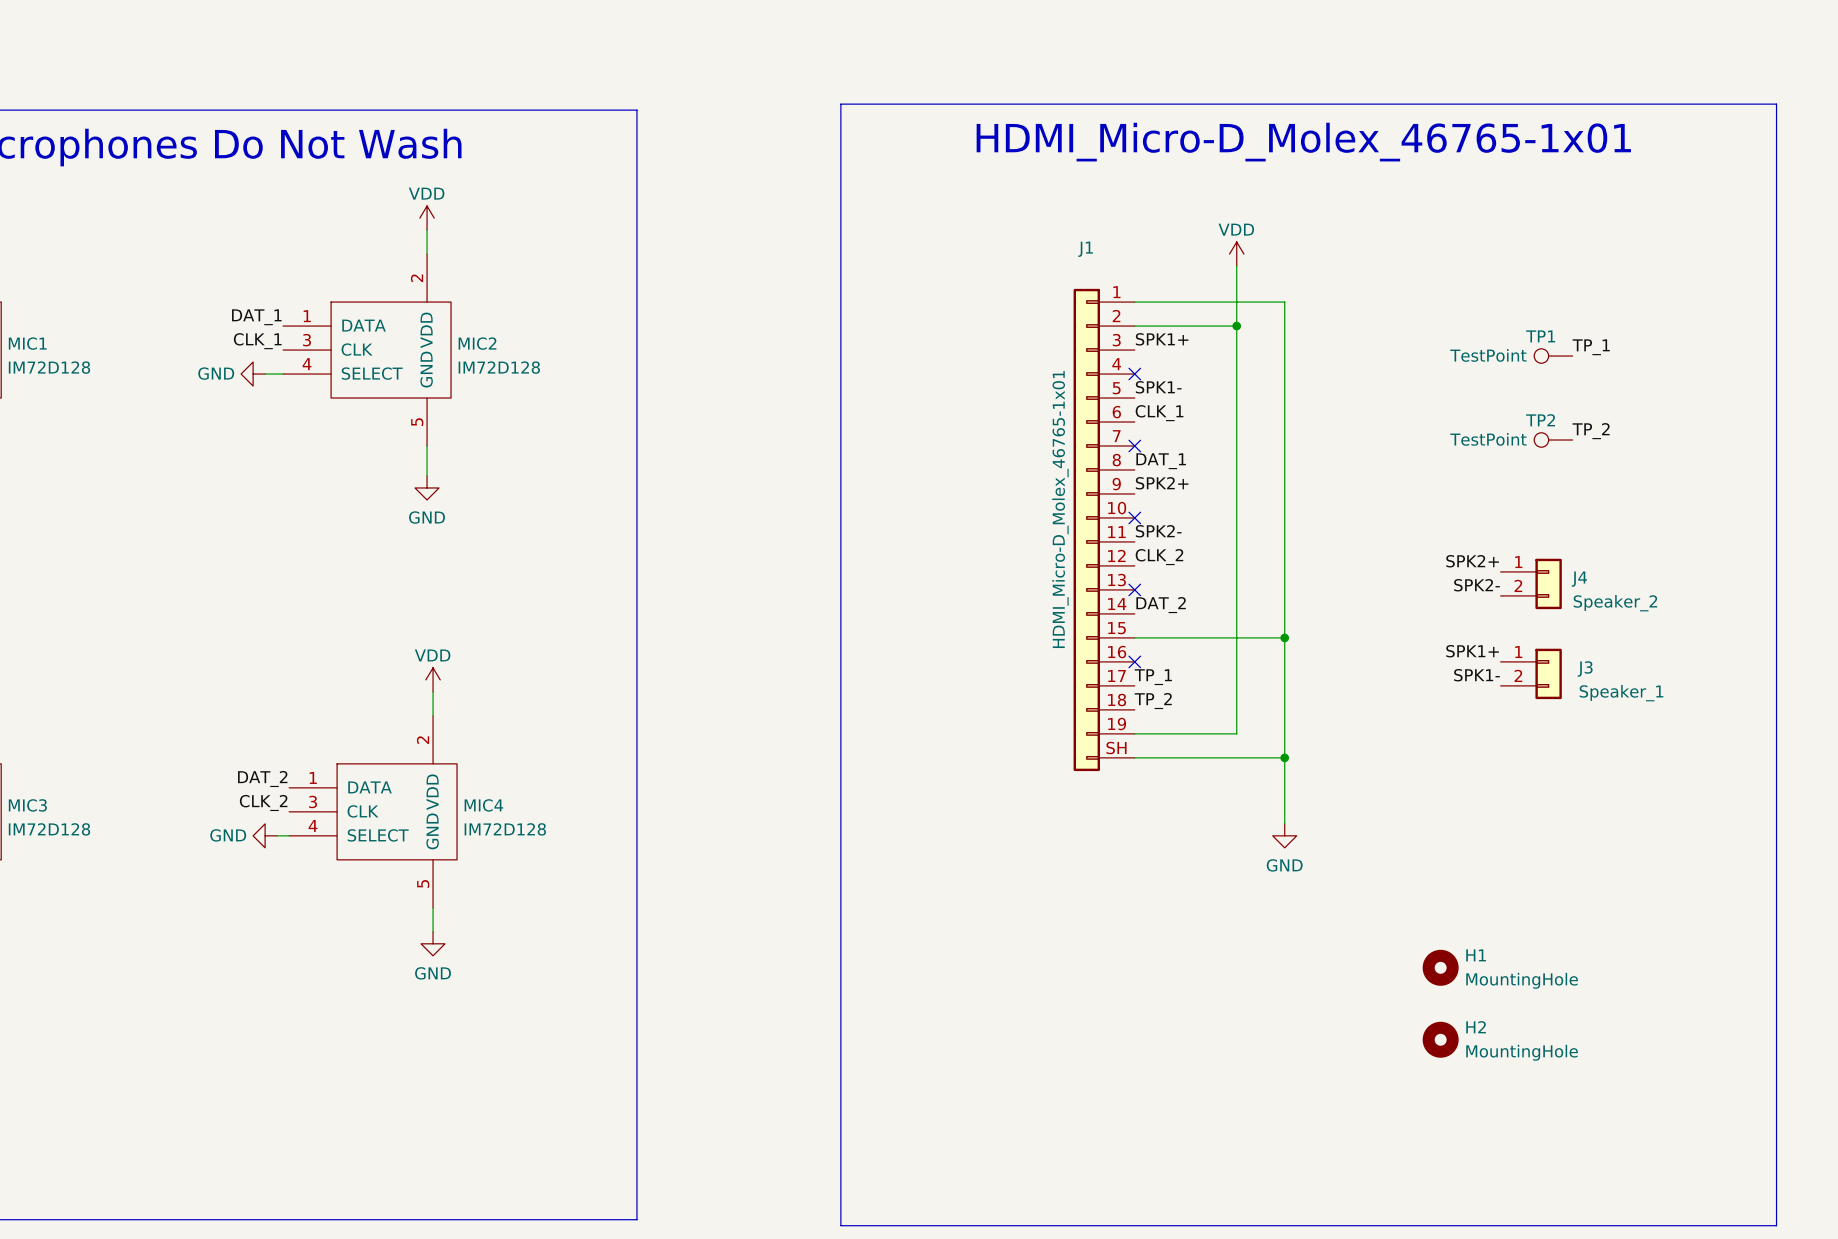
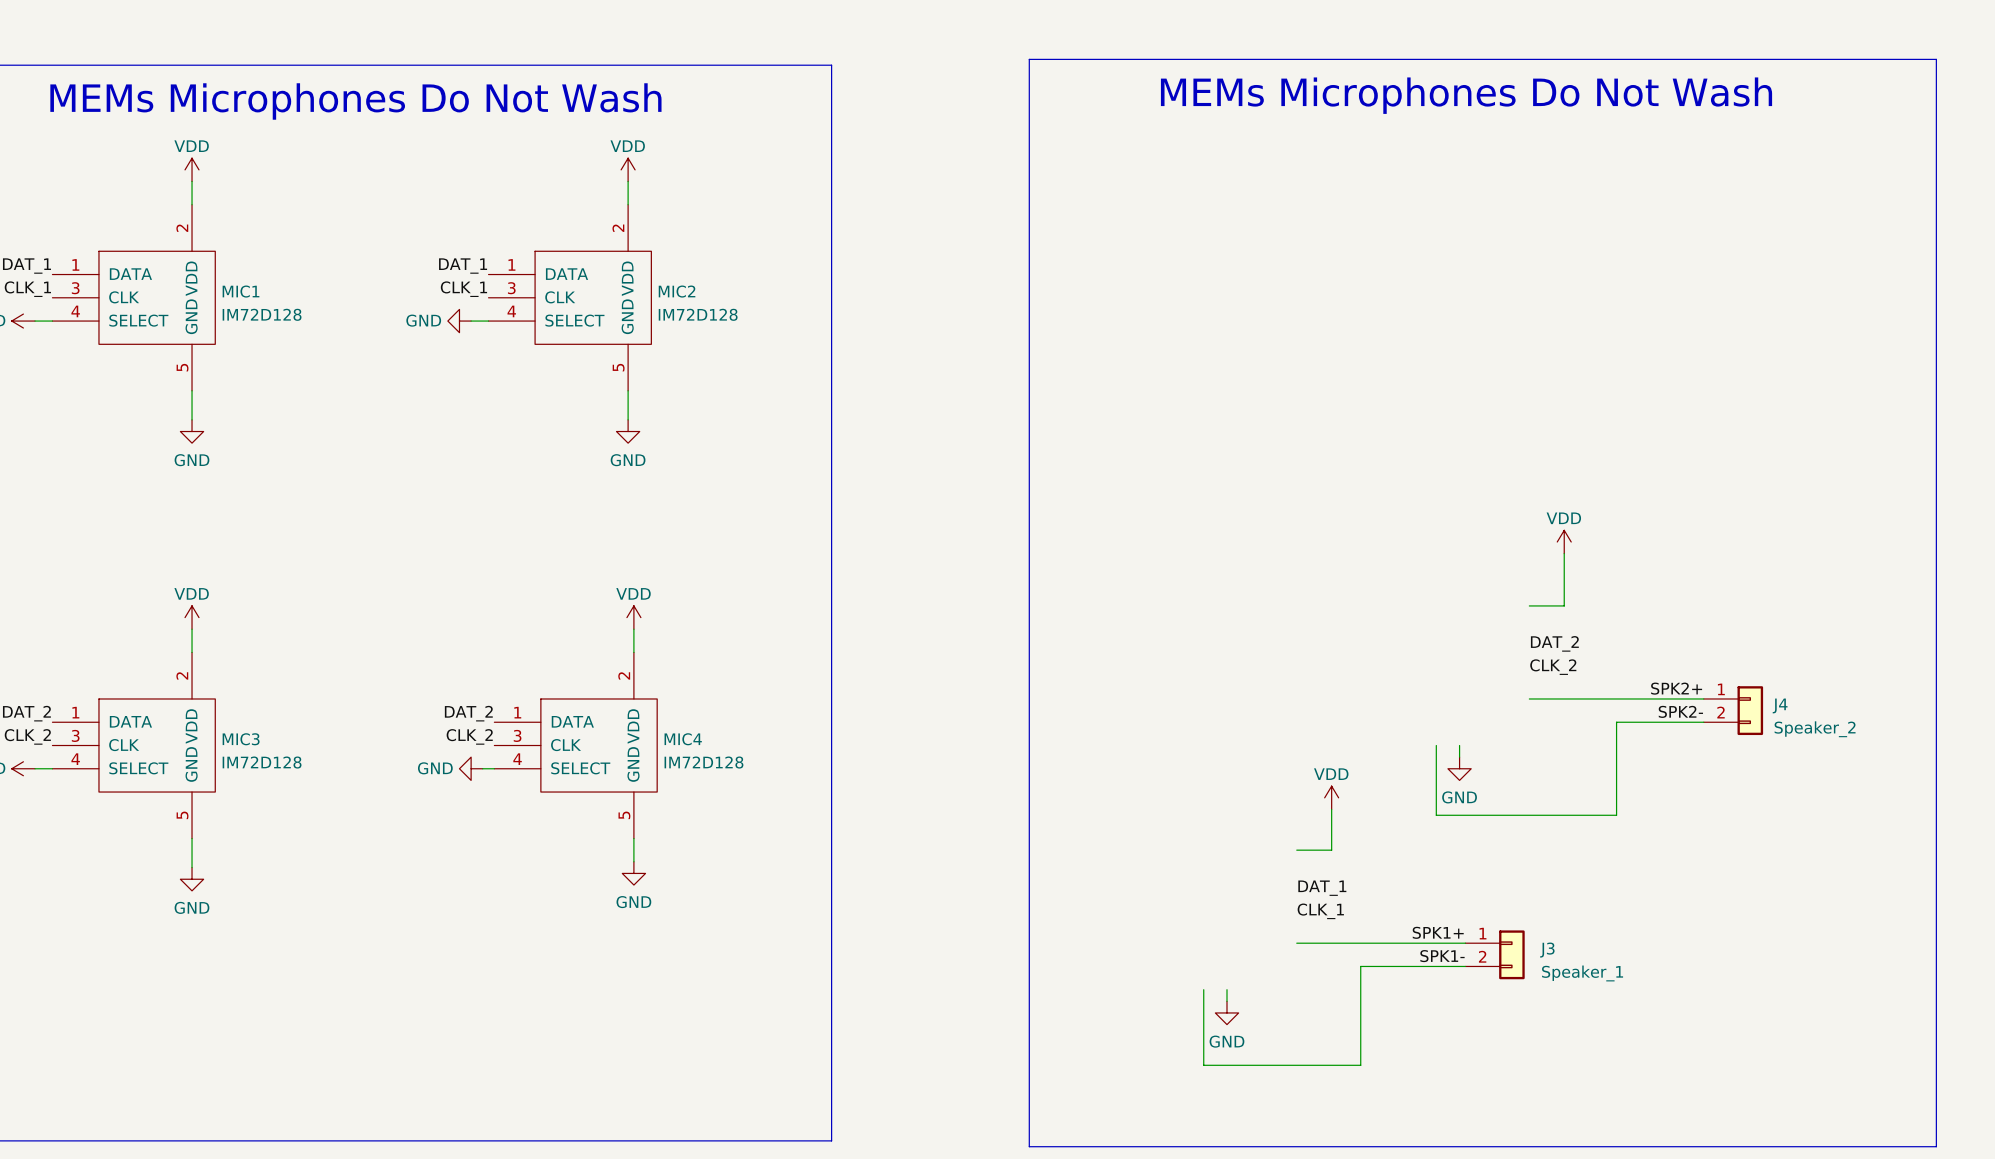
text: HDMI_Micro-D_Molex_46765-1x01 (1303, 142) -> MEMs Microphones Do Not Wash (1466, 95)
power symbol: VDD (1236, 254) -> none
wire: (1236, 266) (1236, 733) (1134, 733) -> none
wire: (1134, 302) (1284, 302) (1284, 811) -> none
wire: (1134, 326) (1236, 326) -> none
junction: (1236, 326) -> none
label: SPK1+ (1162, 339) -> none
label: TP_1 (1591, 347) -> none
TP1: TestPoint (1553, 356) -> none
no-connect mark: (1134, 374) -> none
label: SPK1- (1158, 387) -> none
label: CLK_1 (1159, 413) -> none
label: TP_2 (1591, 431) -> none
TP2: TestPoint (1553, 440) -> none
no-connect mark: (1134, 446) -> none
label: DAT_1 (1161, 461) -> none
label: SPK2+ (1162, 483) -> none
no-connect mark: (1134, 517) -> none
J1: HDMI_Micro-D_Molex_46765-1x01 (1104, 529) -> none
label: SPK2- (1158, 531) -> none
label: CLK_2 (1159, 557) -> none
label position: SPK2+ (1472, 561) -> SPK2+ (1676, 688)
J4 position: (1531, 583) -> (1733, 710)
label position: SPK2- (1476, 585) -> SPK2- (1680, 711)
no-connect mark: (1134, 589) -> none
power symbol: none -> VDD (1564, 541)
label: DAT_2 (1161, 605) -> none
wire: none -> (1564, 553) (1564, 605) (1529, 605)
wire: (1134, 637) (1284, 637) -> none
junction: (1284, 637) -> none
label: SPK1+ (1472, 651) -> none
no-connect mark: (1134, 661) -> none
J3 position: (1531, 673) -> (1495, 954)
label: SPK1- (1476, 675) -> none
label: TP_1 (1153, 677) -> none
label: TP_2 (1153, 701) -> none
label: none -> DAT_2 (1554, 643)
label: none -> CLK_2 (1553, 667)
wire: (1134, 757) (1284, 757) -> none
junction: (1284, 757) -> none
wire: none -> (1529, 698) (1703, 698)
wire: none -> (1703, 722) (1616, 722) (1616, 815) (1436, 815) (1436, 745)
power symbol: none -> VDD (1331, 797)
wire: none -> (1331, 809) (1331, 850) (1296, 850)
label: none -> DAT_1 (1322, 888)
H1: MountingHole (1440, 967) -> none
label: none -> CLK_1 (1320, 911)
label: none -> SPK1+ (1438, 932)
wire: none -> (1296, 943) (1465, 943)
label: none -> SPK1- (1442, 956)
wire: none -> (1465, 966) (1360, 966) (1360, 1065) (1203, 1065) (1203, 989)
H2: MountingHole (1440, 1039) -> none
wire: none -> (1226, 989) (1226, 1001)
power symbol: none -> GND (1226, 1012)

